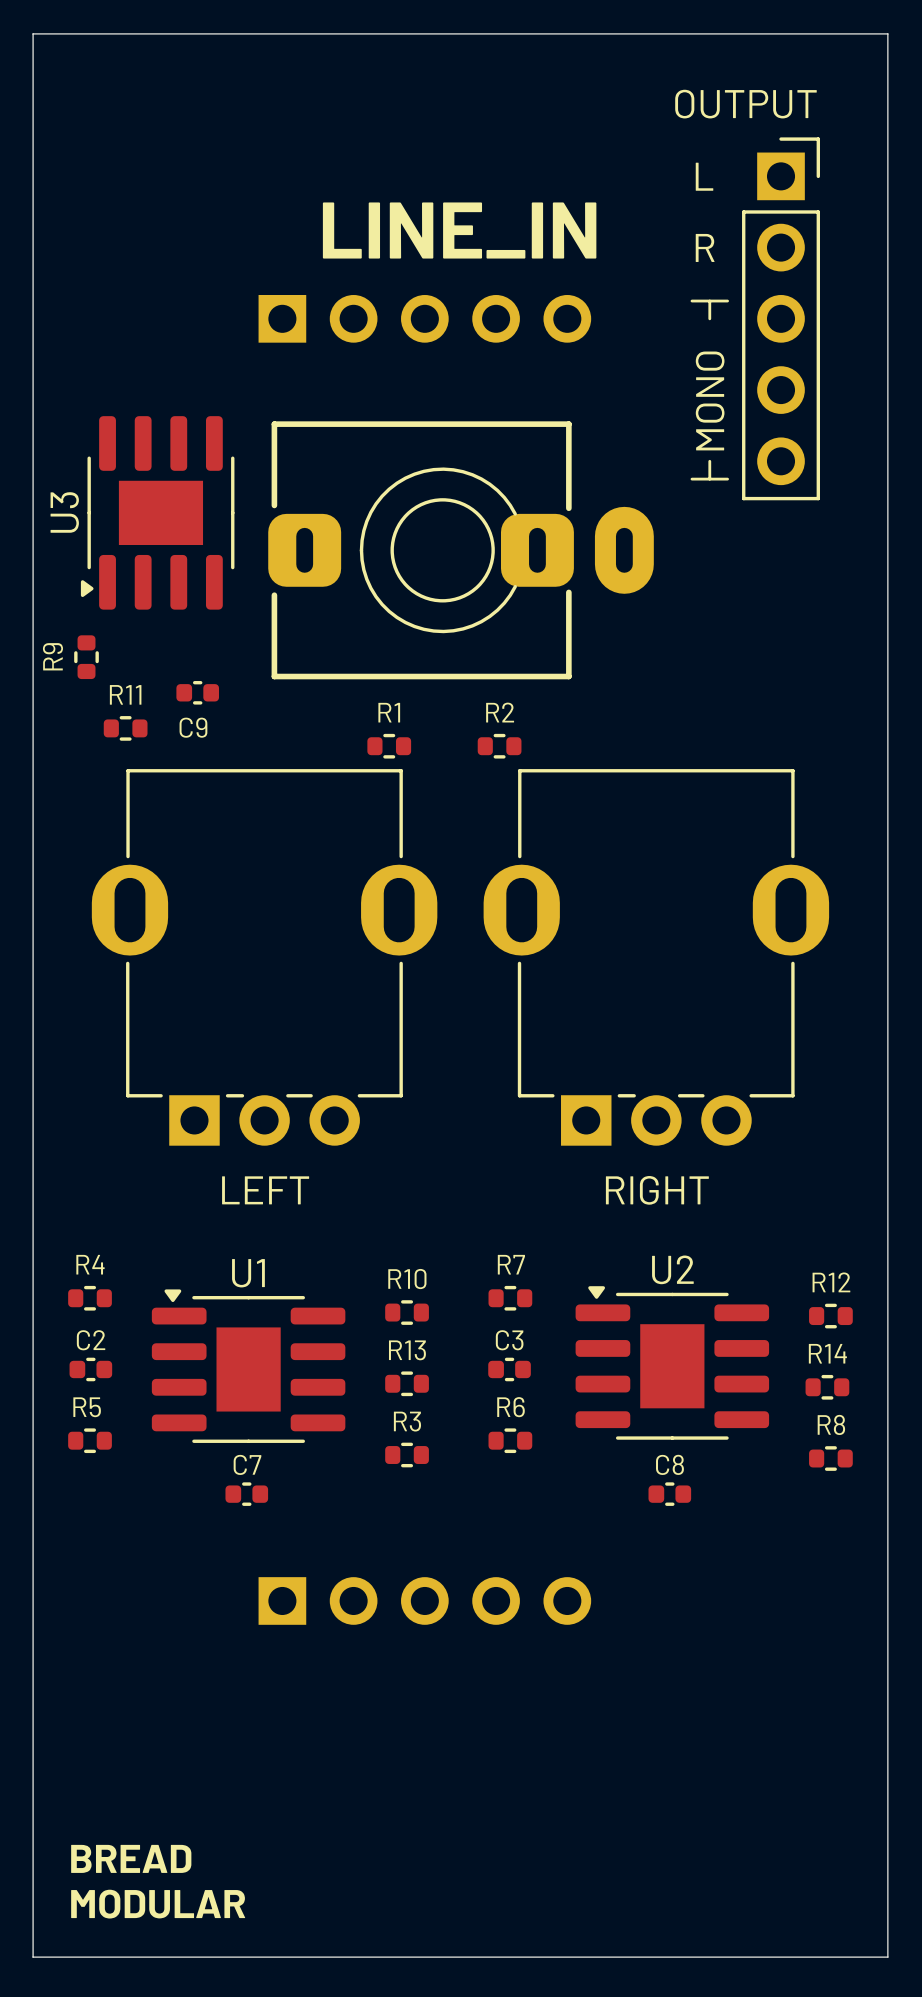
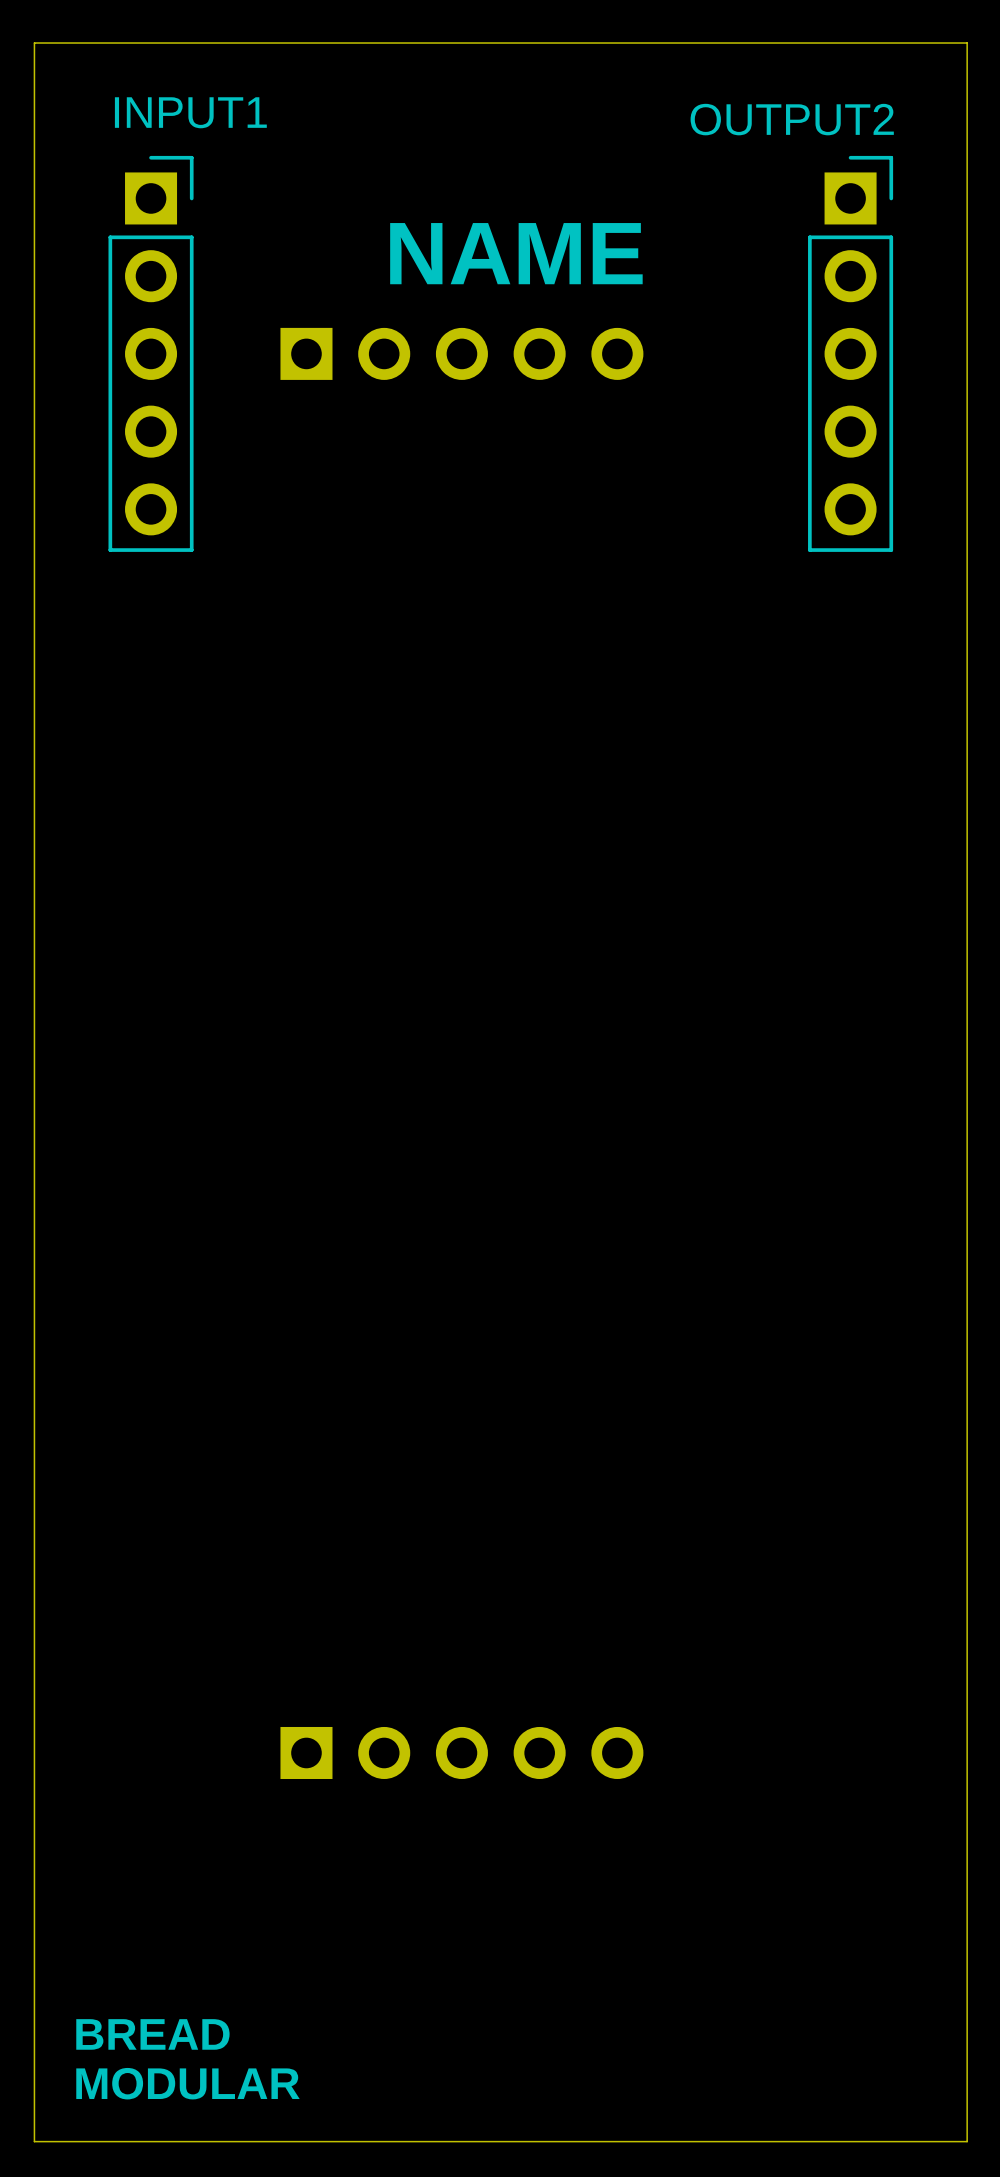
OUTPUT name: OUTPUT (745, 104) -> OUTPUT2 (792, 119)
text: L (704, 176) -> none
text: none -> NAME (516, 253)
text: LINE_IN (459, 230) -> none
text: R (705, 247) -> none
line: (691, 301) (727, 301) -> none
line: (709, 301) (709, 318) -> none
INPUT1: none -> (151, 353)
text: MONO (710, 400) -> none
line: (709, 461) (709, 479) -> none
line: (691, 479) (727, 479) -> none
U3: (157, 512) -> none
part: (461, 550) -> none
R9: (86, 657) -> none
C9: (197, 692) -> none
R11: (125, 728) -> none
R1: (389, 746) -> none
R2: (499, 746) -> none
LEFT: (264, 957) -> none
RIGHT: (656, 957) -> none
R4: (90, 1298) -> none
R7: (510, 1298) -> none
R10: (407, 1312) -> none
R12: (830, 1316) -> none
U2: (672, 1362) -> none
U1: (248, 1366) -> none
C2: (90, 1369) -> none
C3: (509, 1369) -> none
R13: (407, 1383) -> none
R14: (827, 1387) -> none
R5: (90, 1440) -> none
R6: (510, 1440) -> none
R3: (407, 1455) -> none
R8: (830, 1458) -> none
C7: (246, 1494) -> none
C8: (669, 1494) -> none

